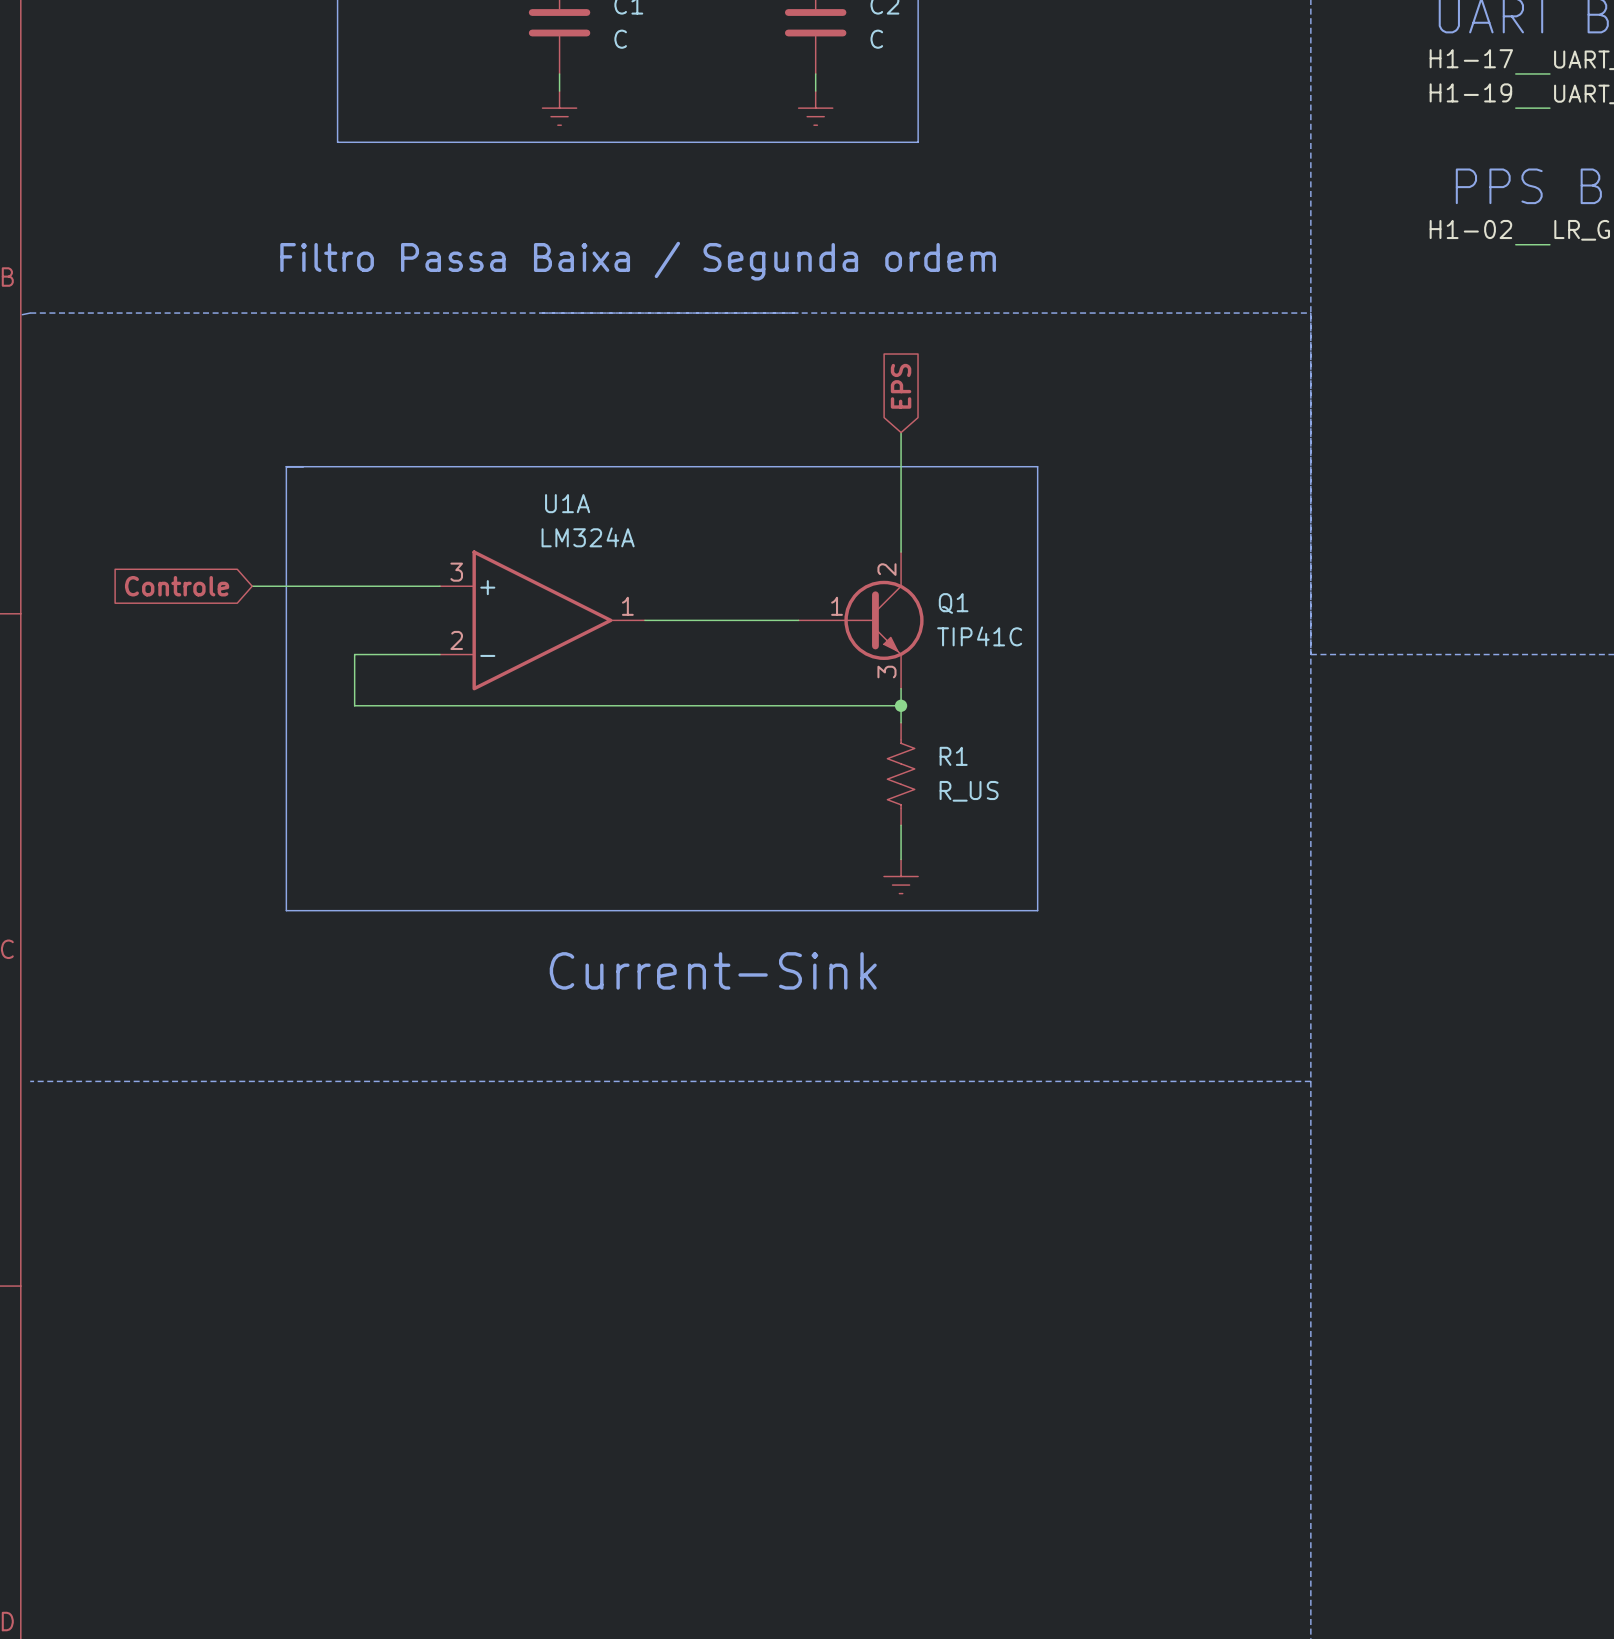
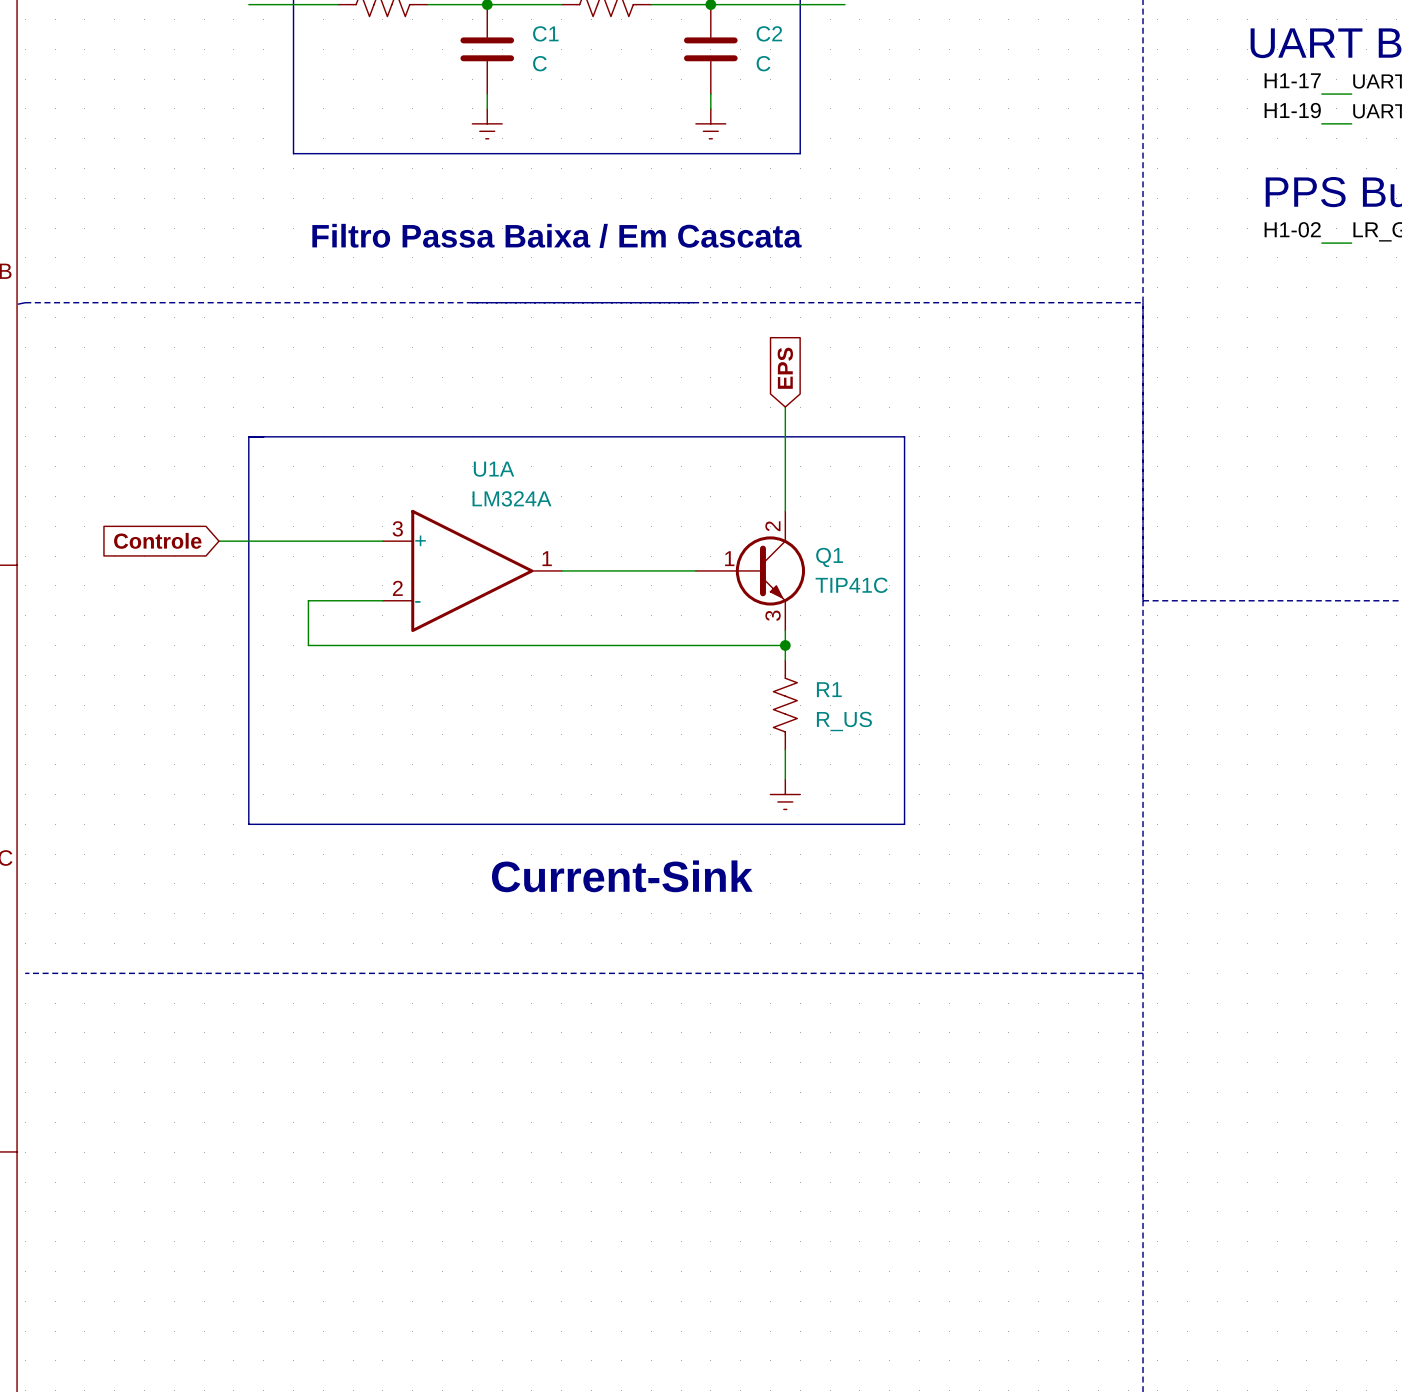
text: Filtro Passa Baixa / Segunda ordem (638, 261) -> Filtro Passa Baixa / Em Cascata (557, 235)

